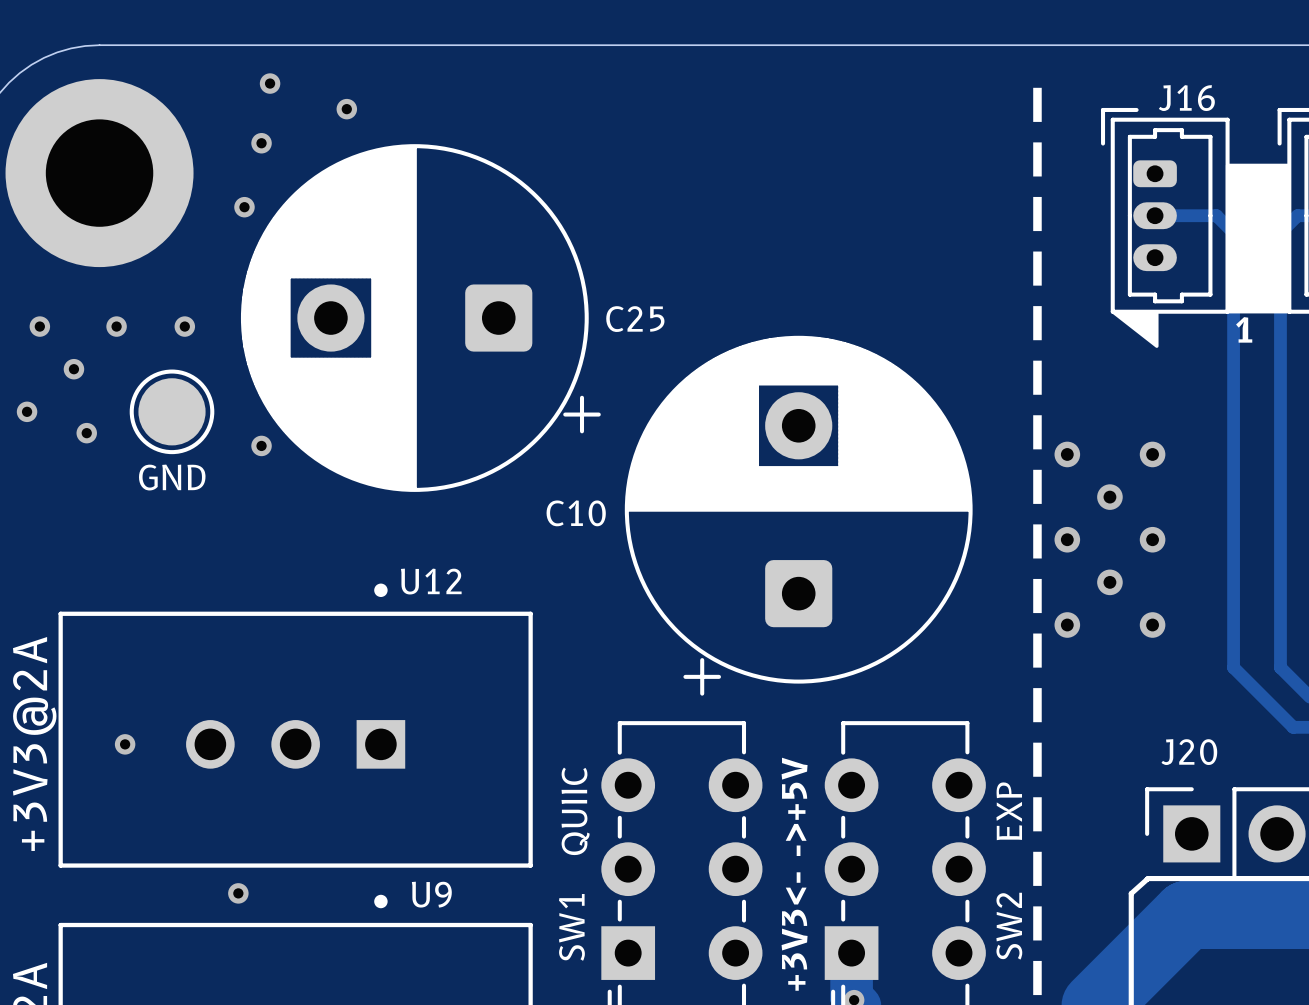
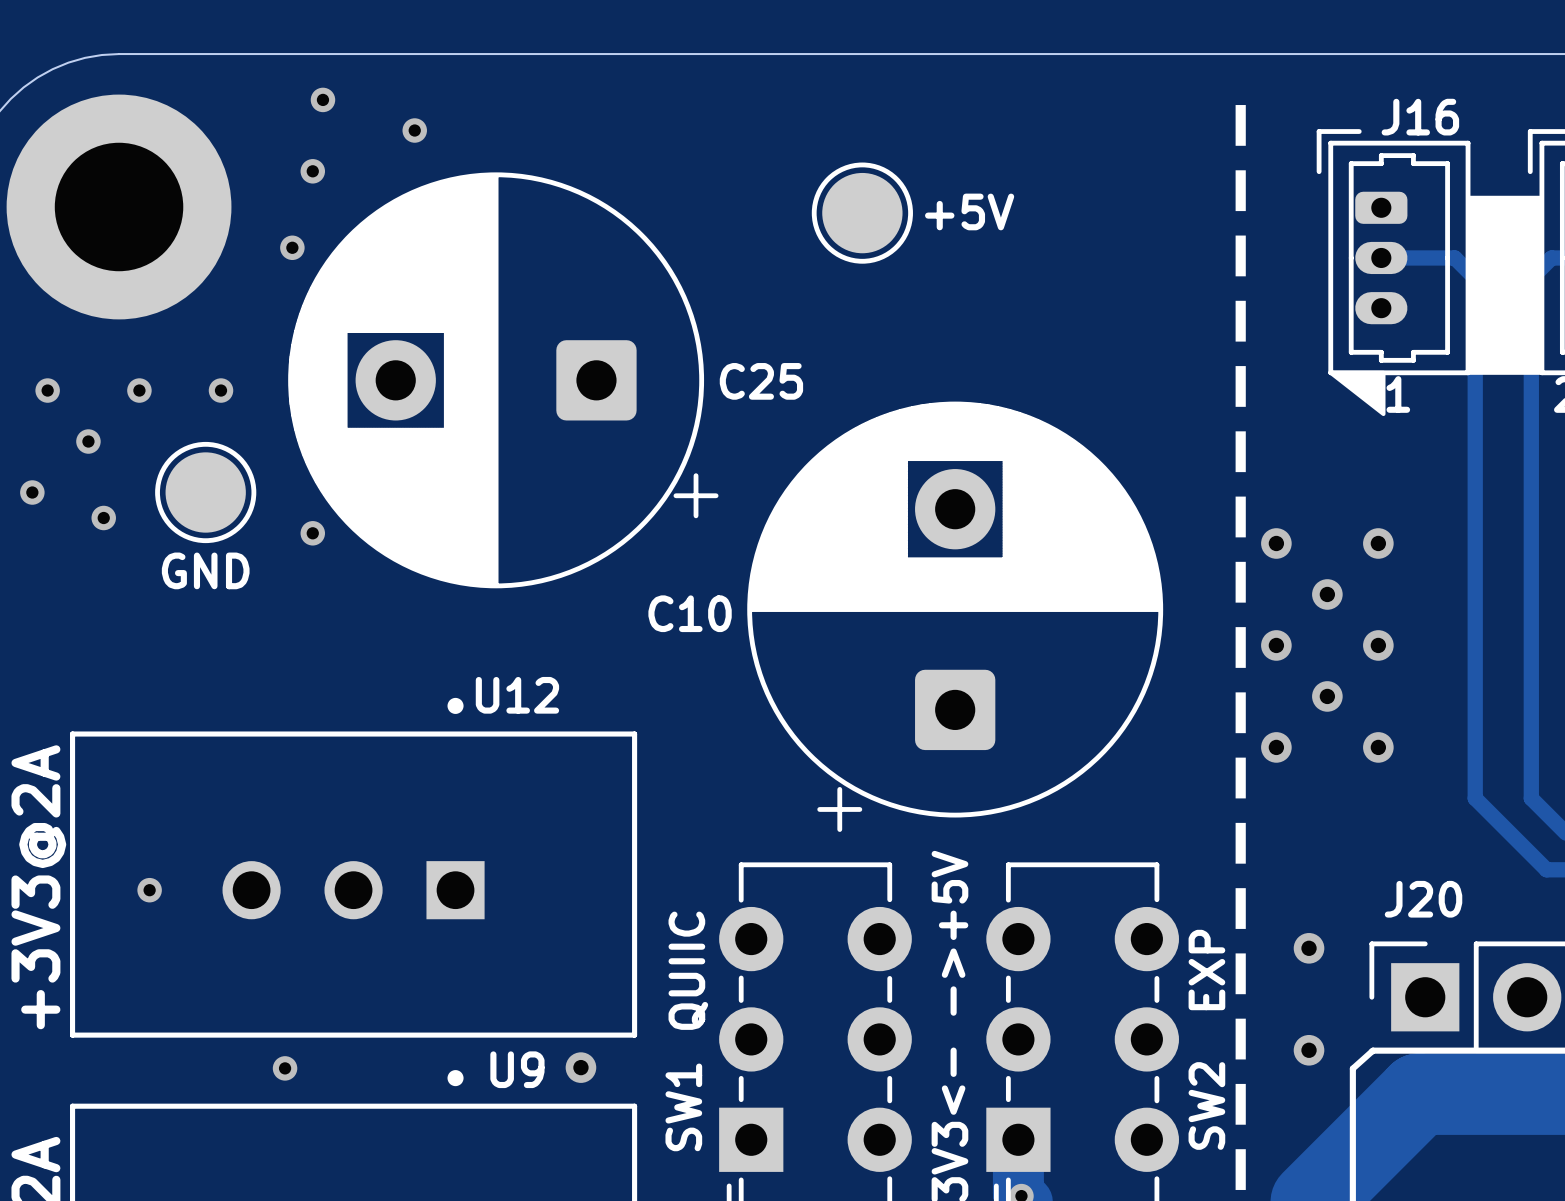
part: none -> +5V (862, 213)
via: none -> (1309, 948)
via: none -> (1309, 1050)
via: none -> (580, 1067)

